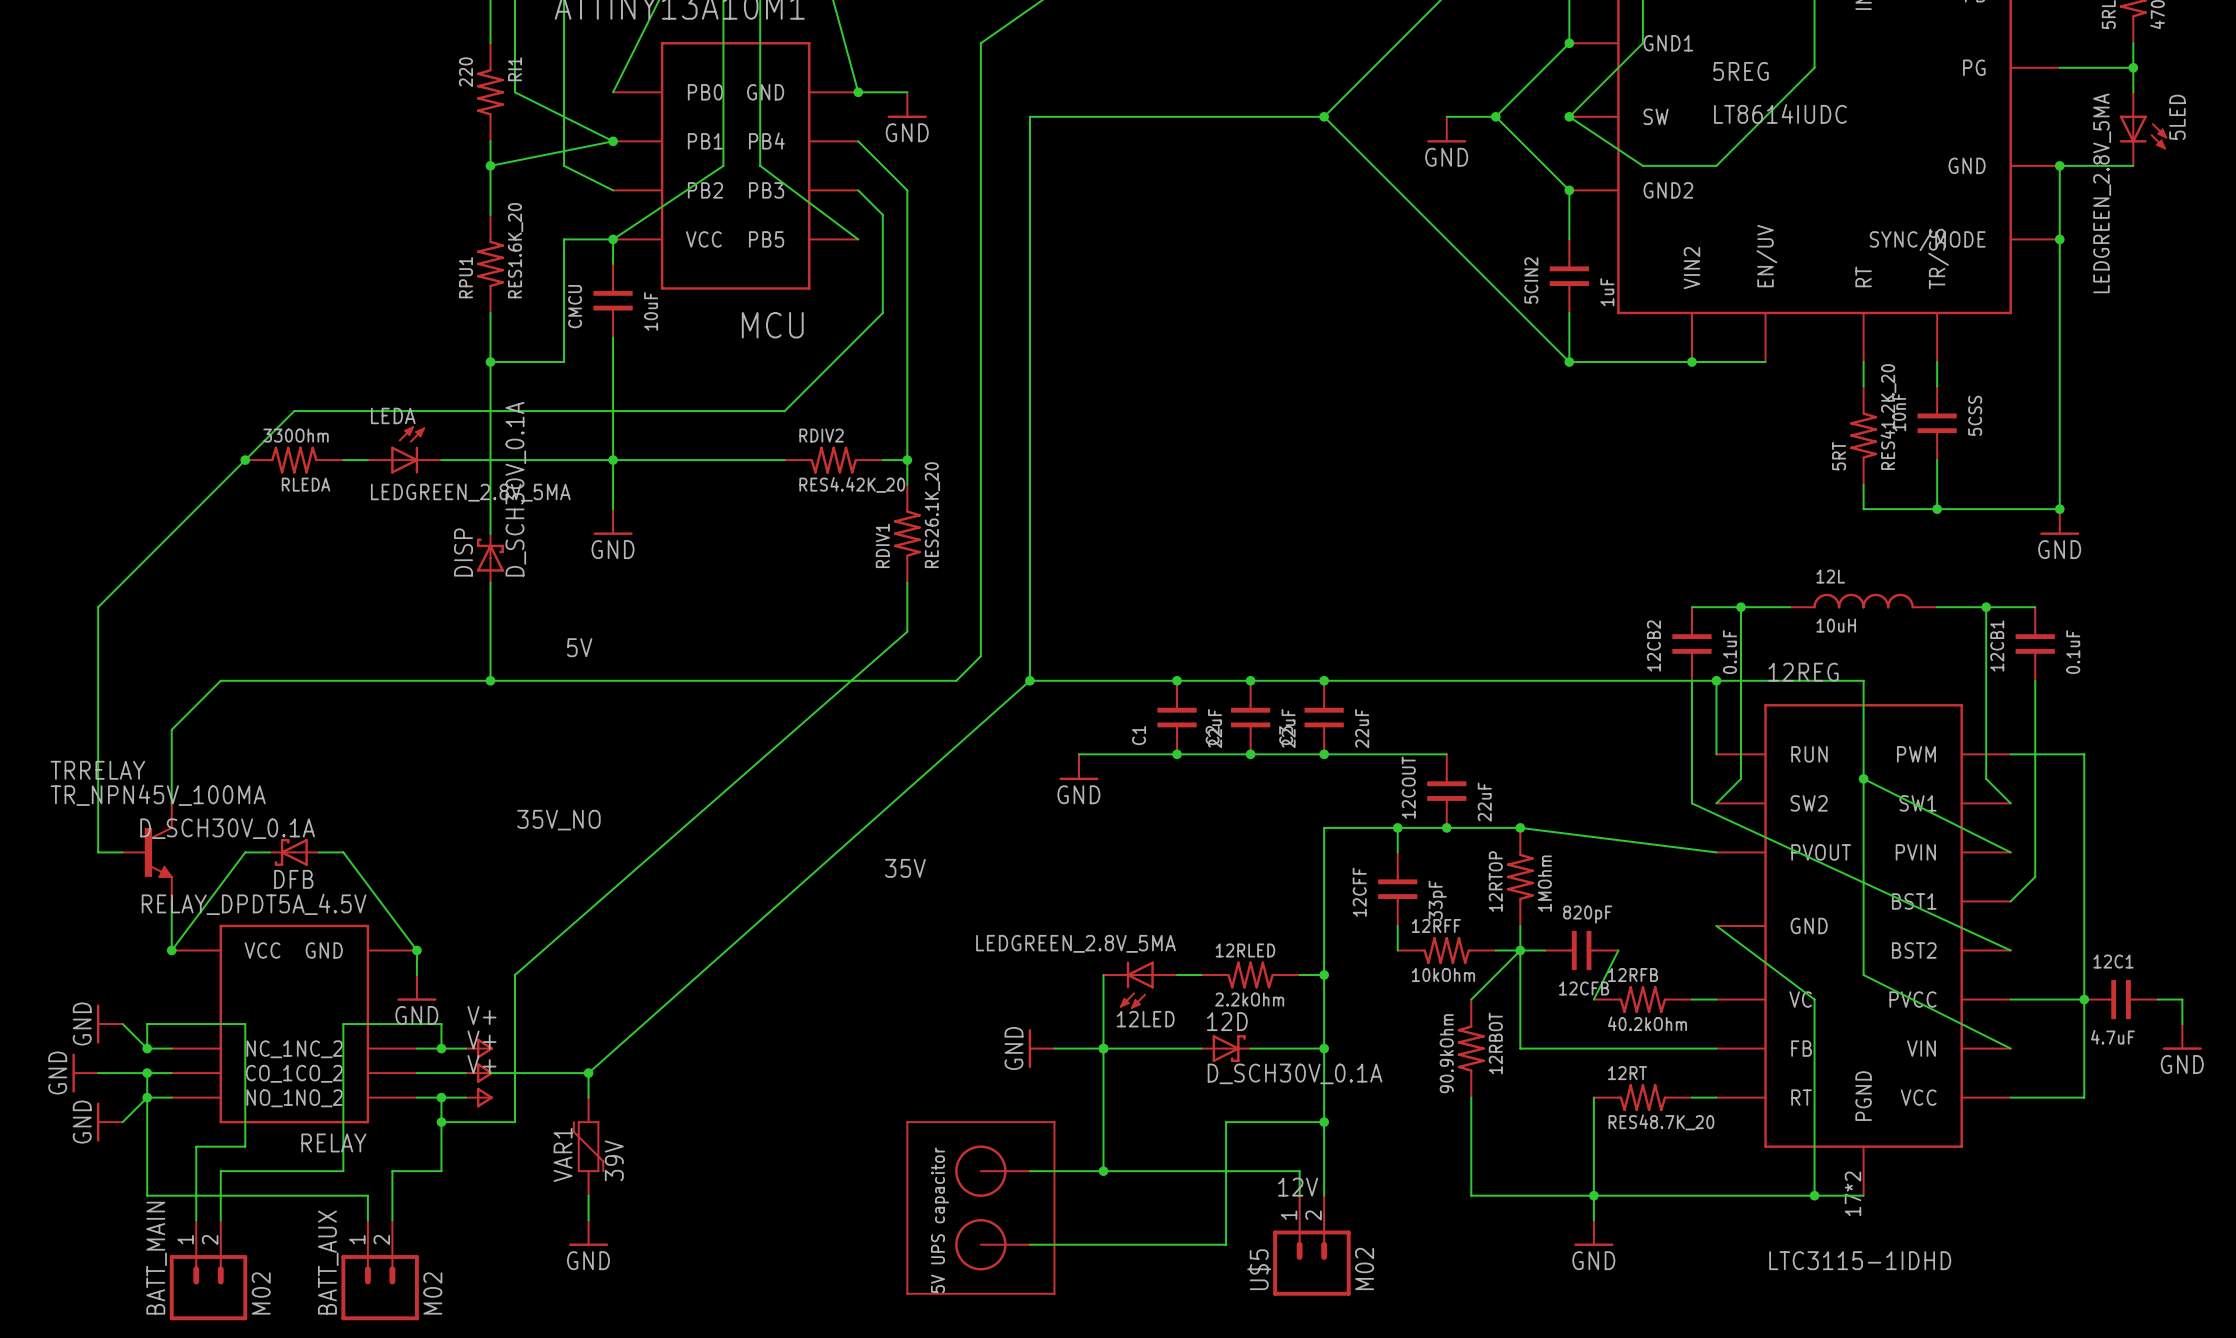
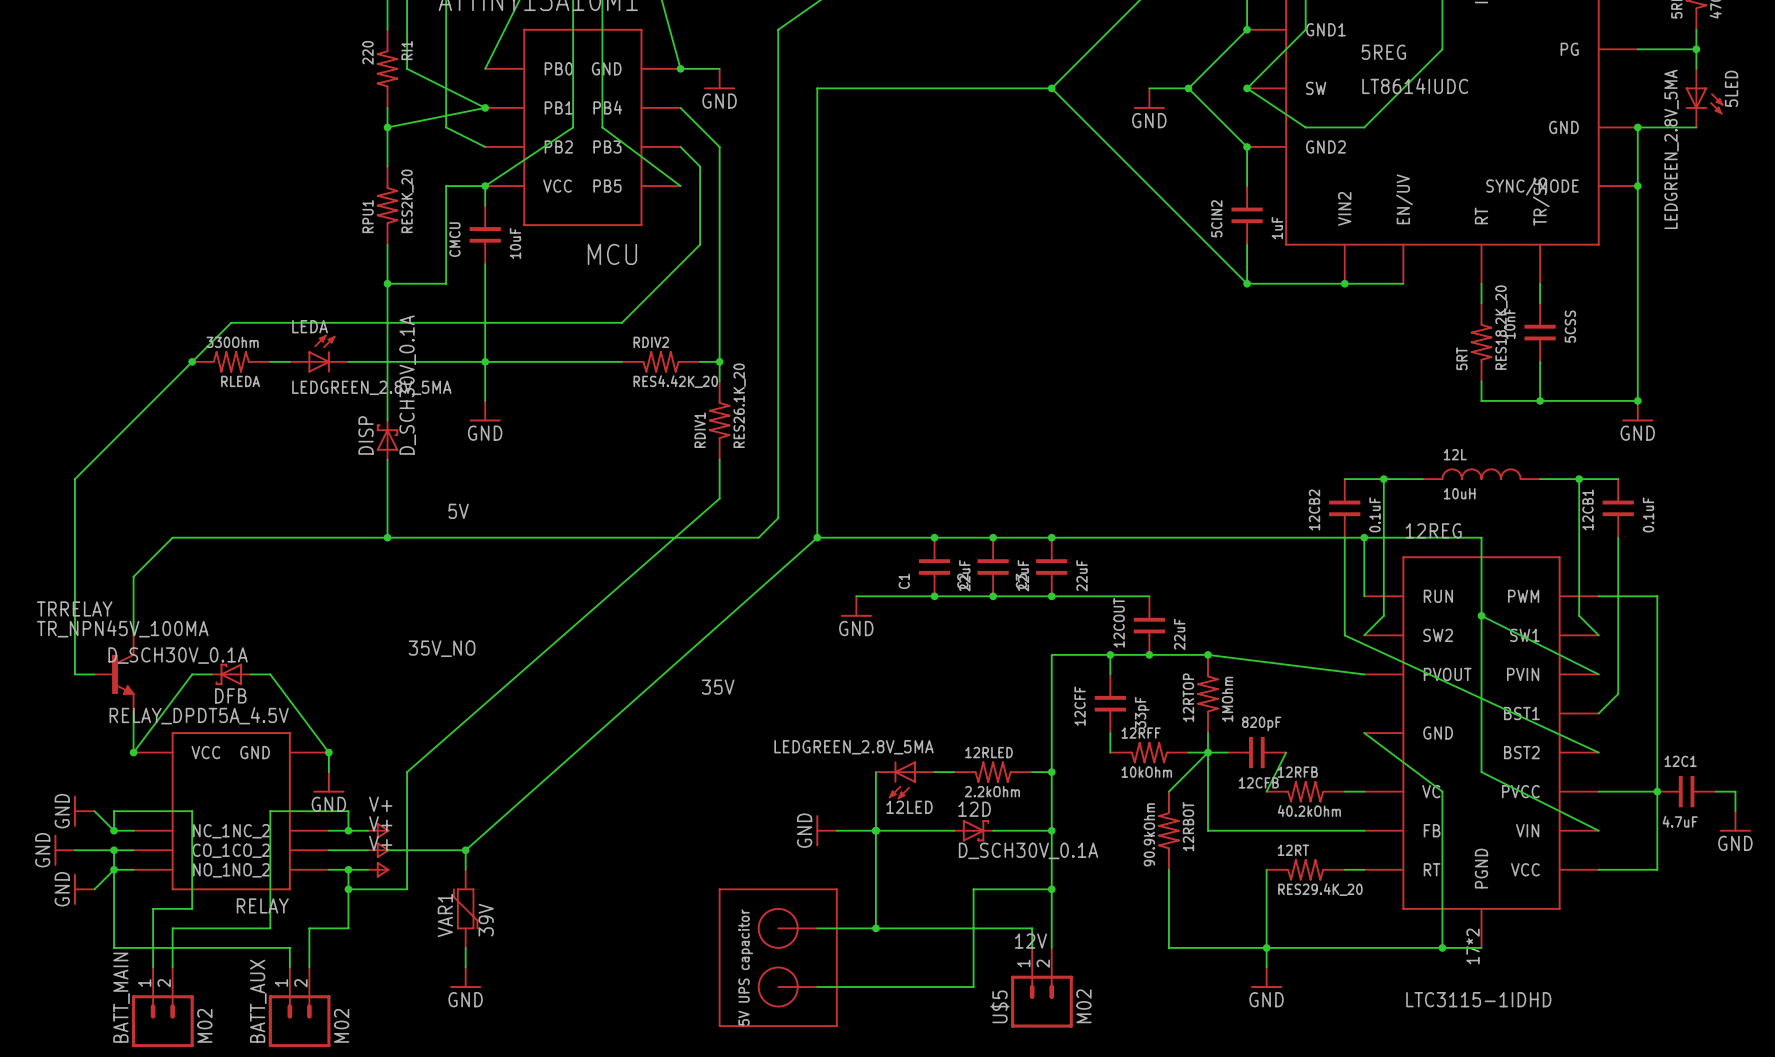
RPU1 value: RES1.6K_20 (515, 250) -> RES2K_20 (407, 201)
5RT value: RES41.2K_20 (1888, 417) -> RES18.2K_20 (1501, 327)
12RT value: RES48.7K_20 (1661, 1122) -> RES29.4K_20 (1320, 889)

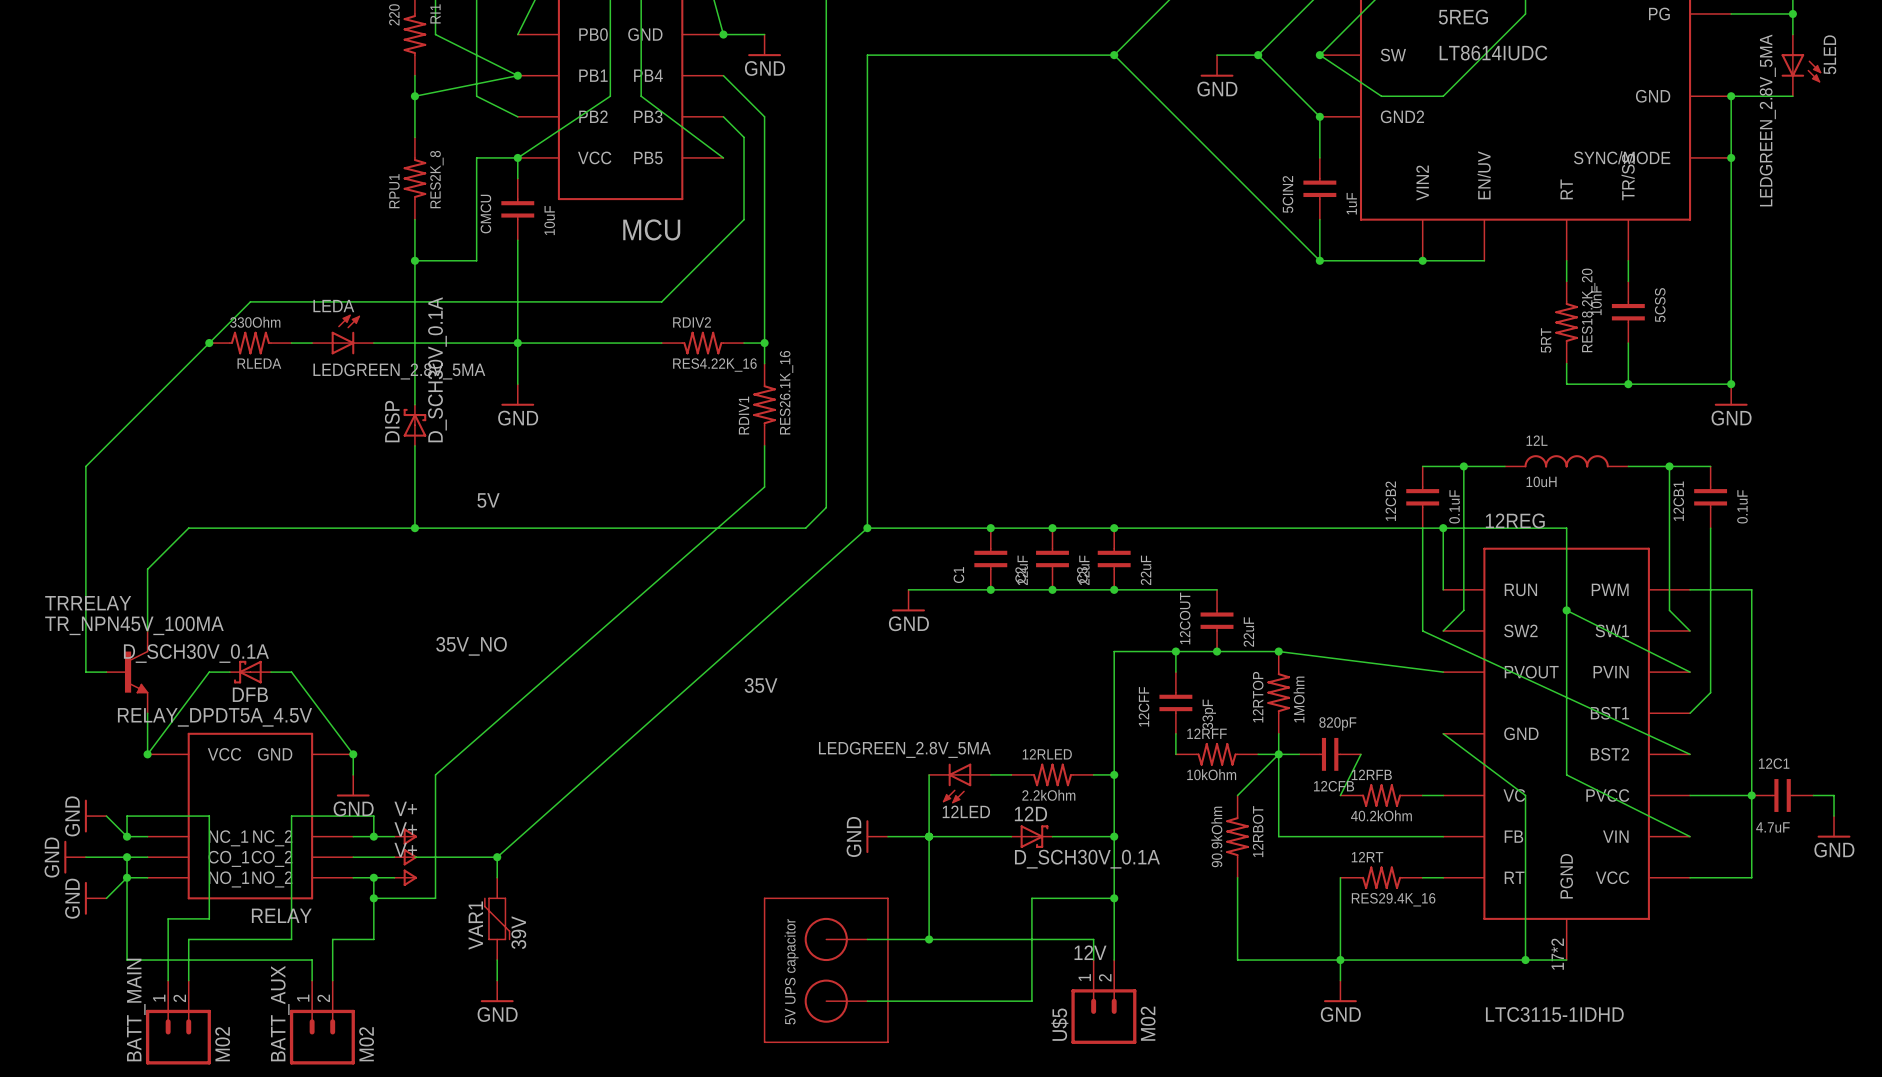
RPU1 value: RES2K_20 (407, 201) -> RES2K_8 (436, 179)
RDIV2 value: RES4.42K_20 (675, 381) -> RES4.22K_16 (714, 365)
RDIV1 value: RES26.1K_20 (739, 405) -> RES26.1K_16 (786, 392)
12RT value: RES29.4K_20 (1320, 889) -> RES29.4K_16 (1393, 899)

